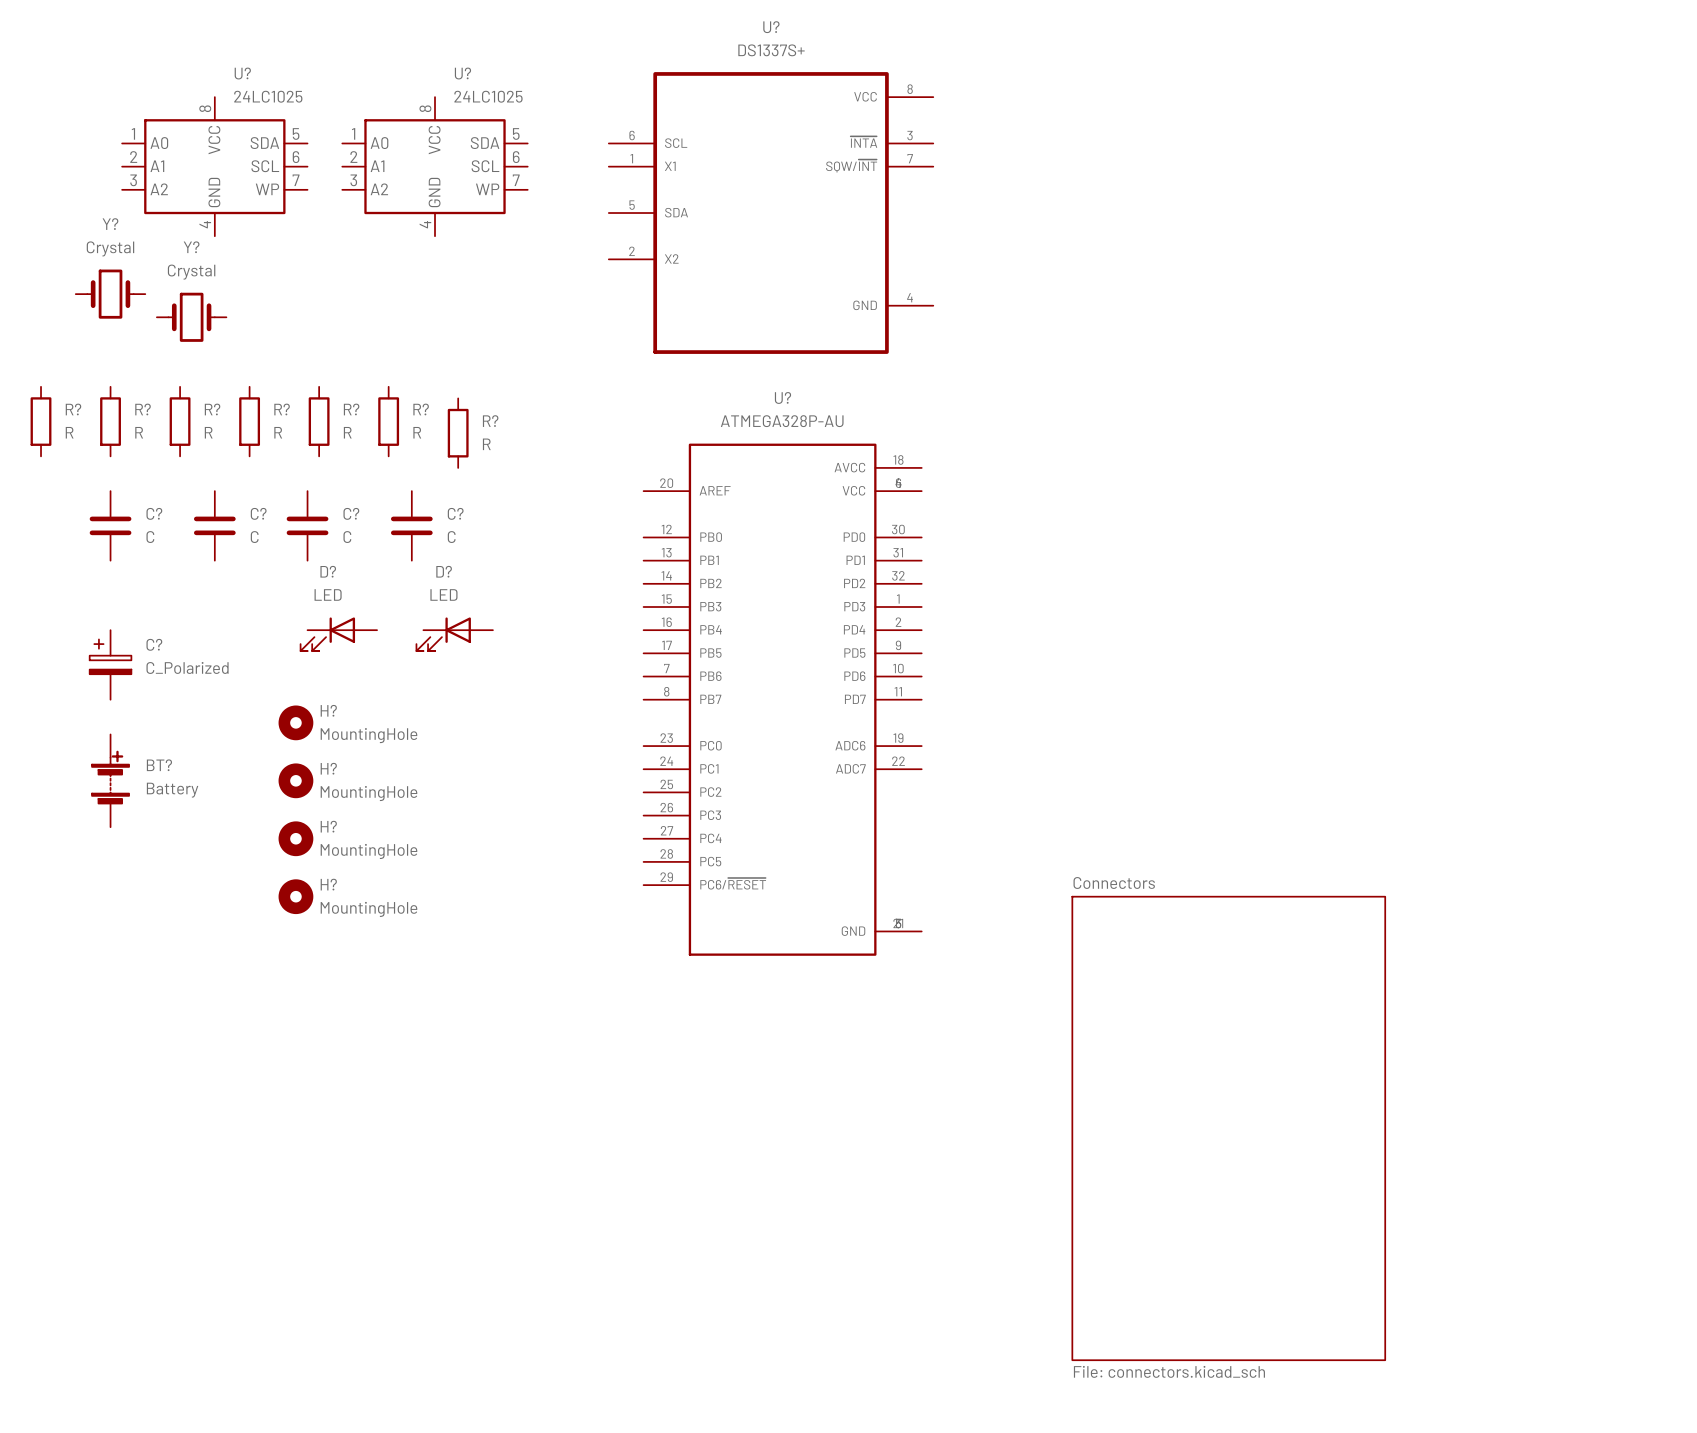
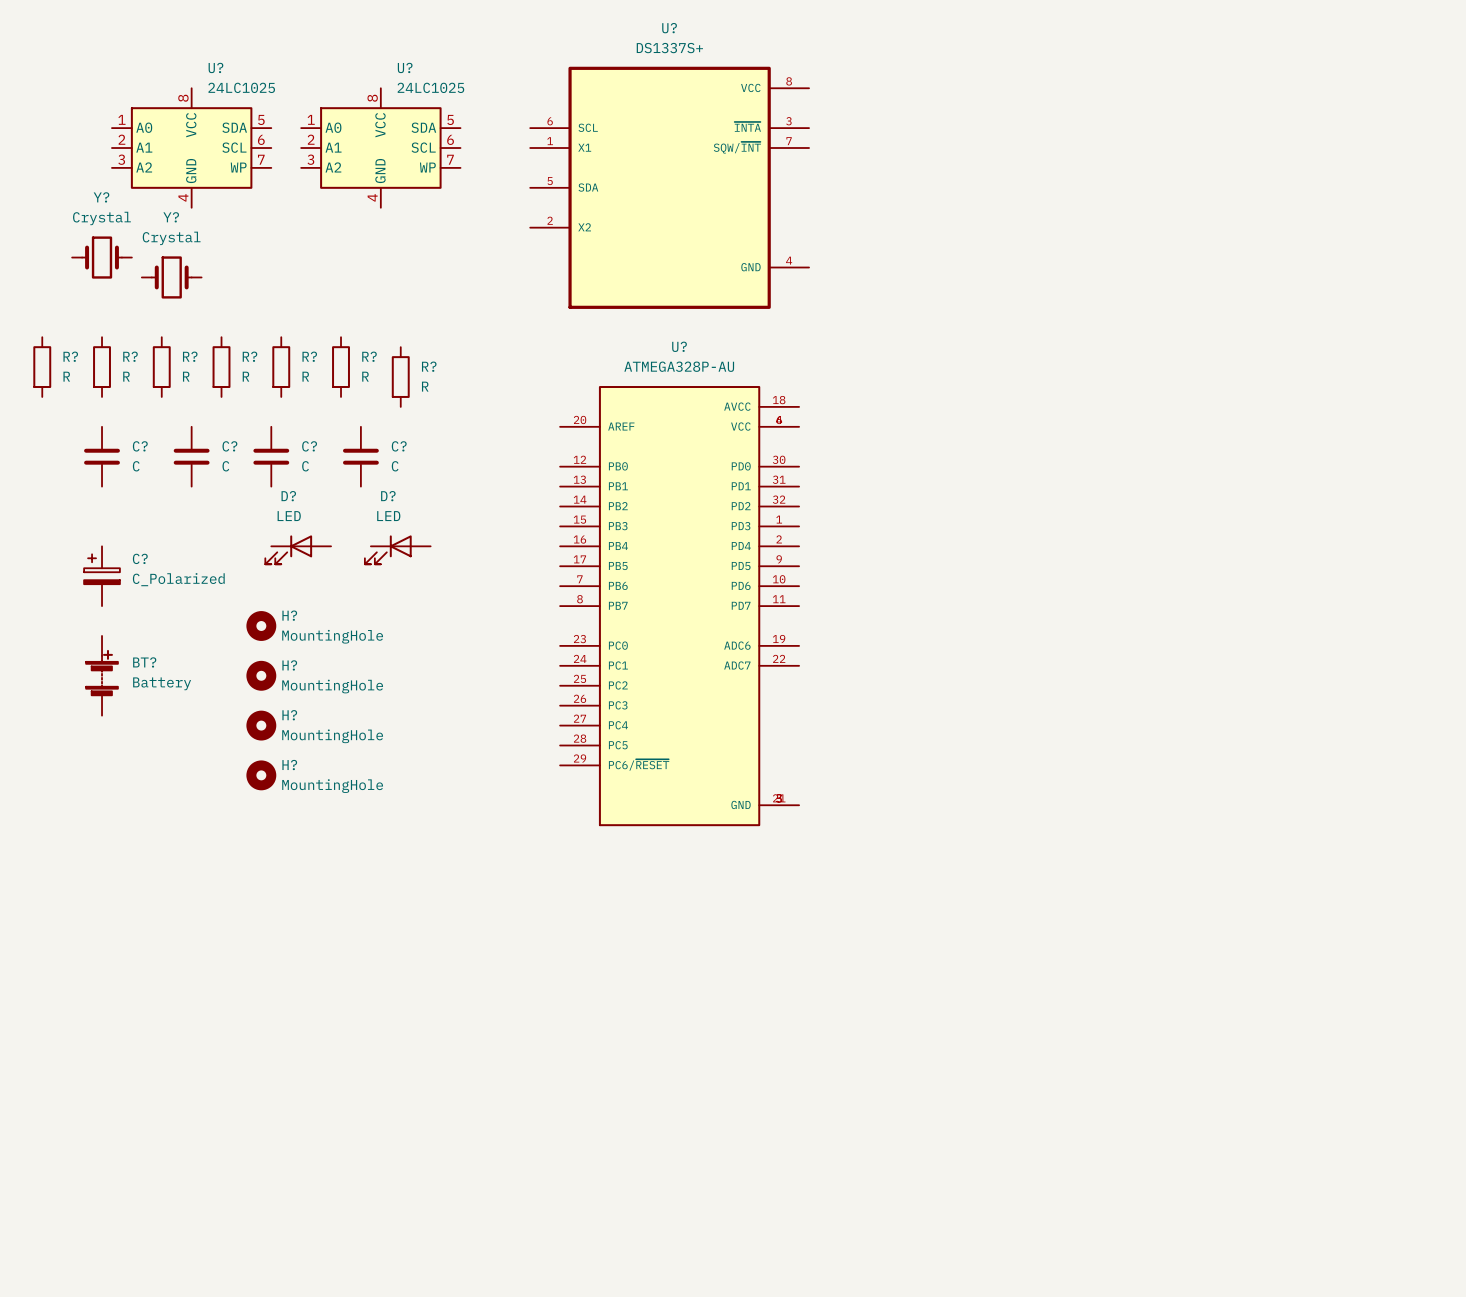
sheet Connectors: File: connectors.kicad_sch (1228, 1128) -> none

